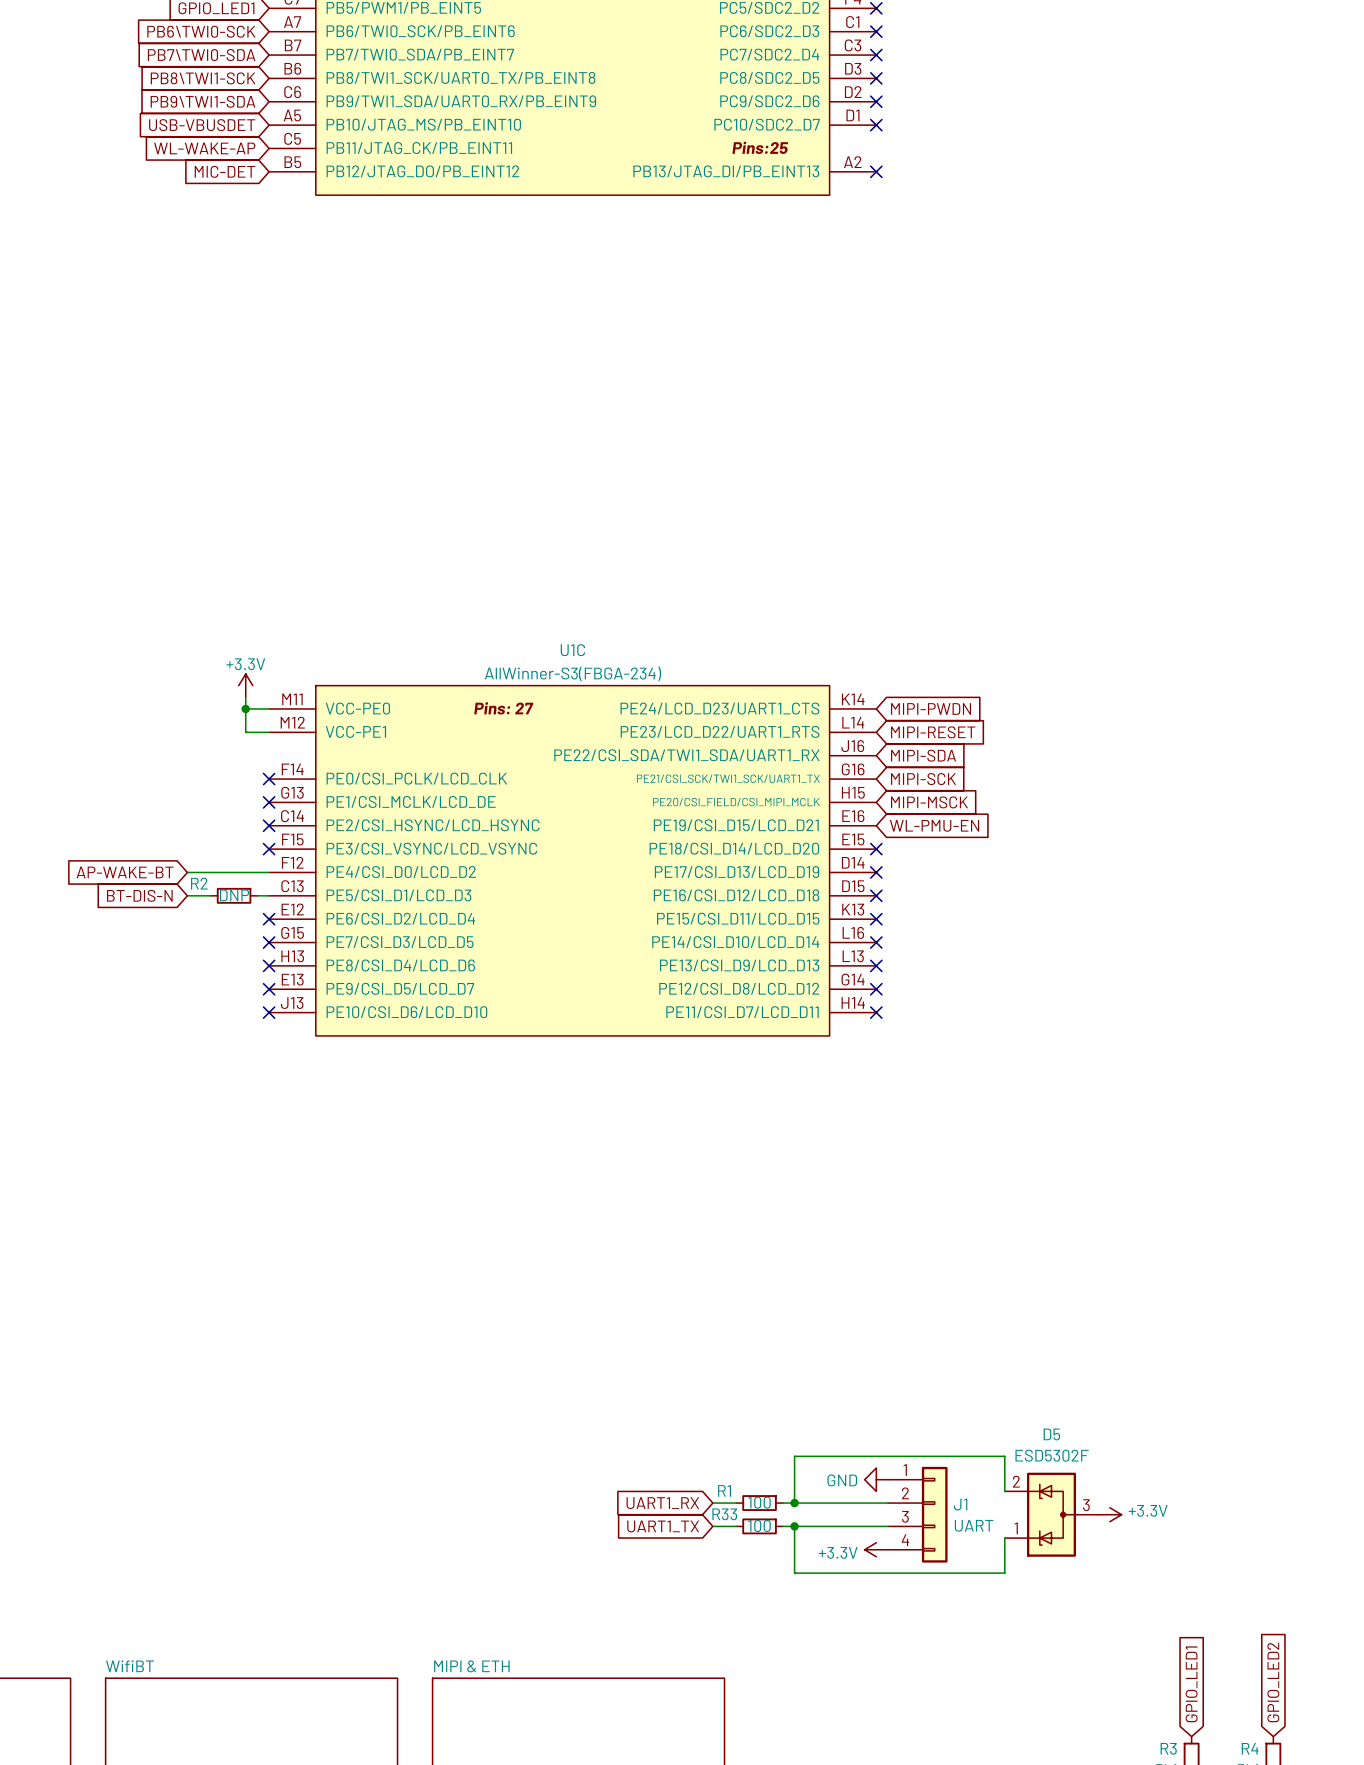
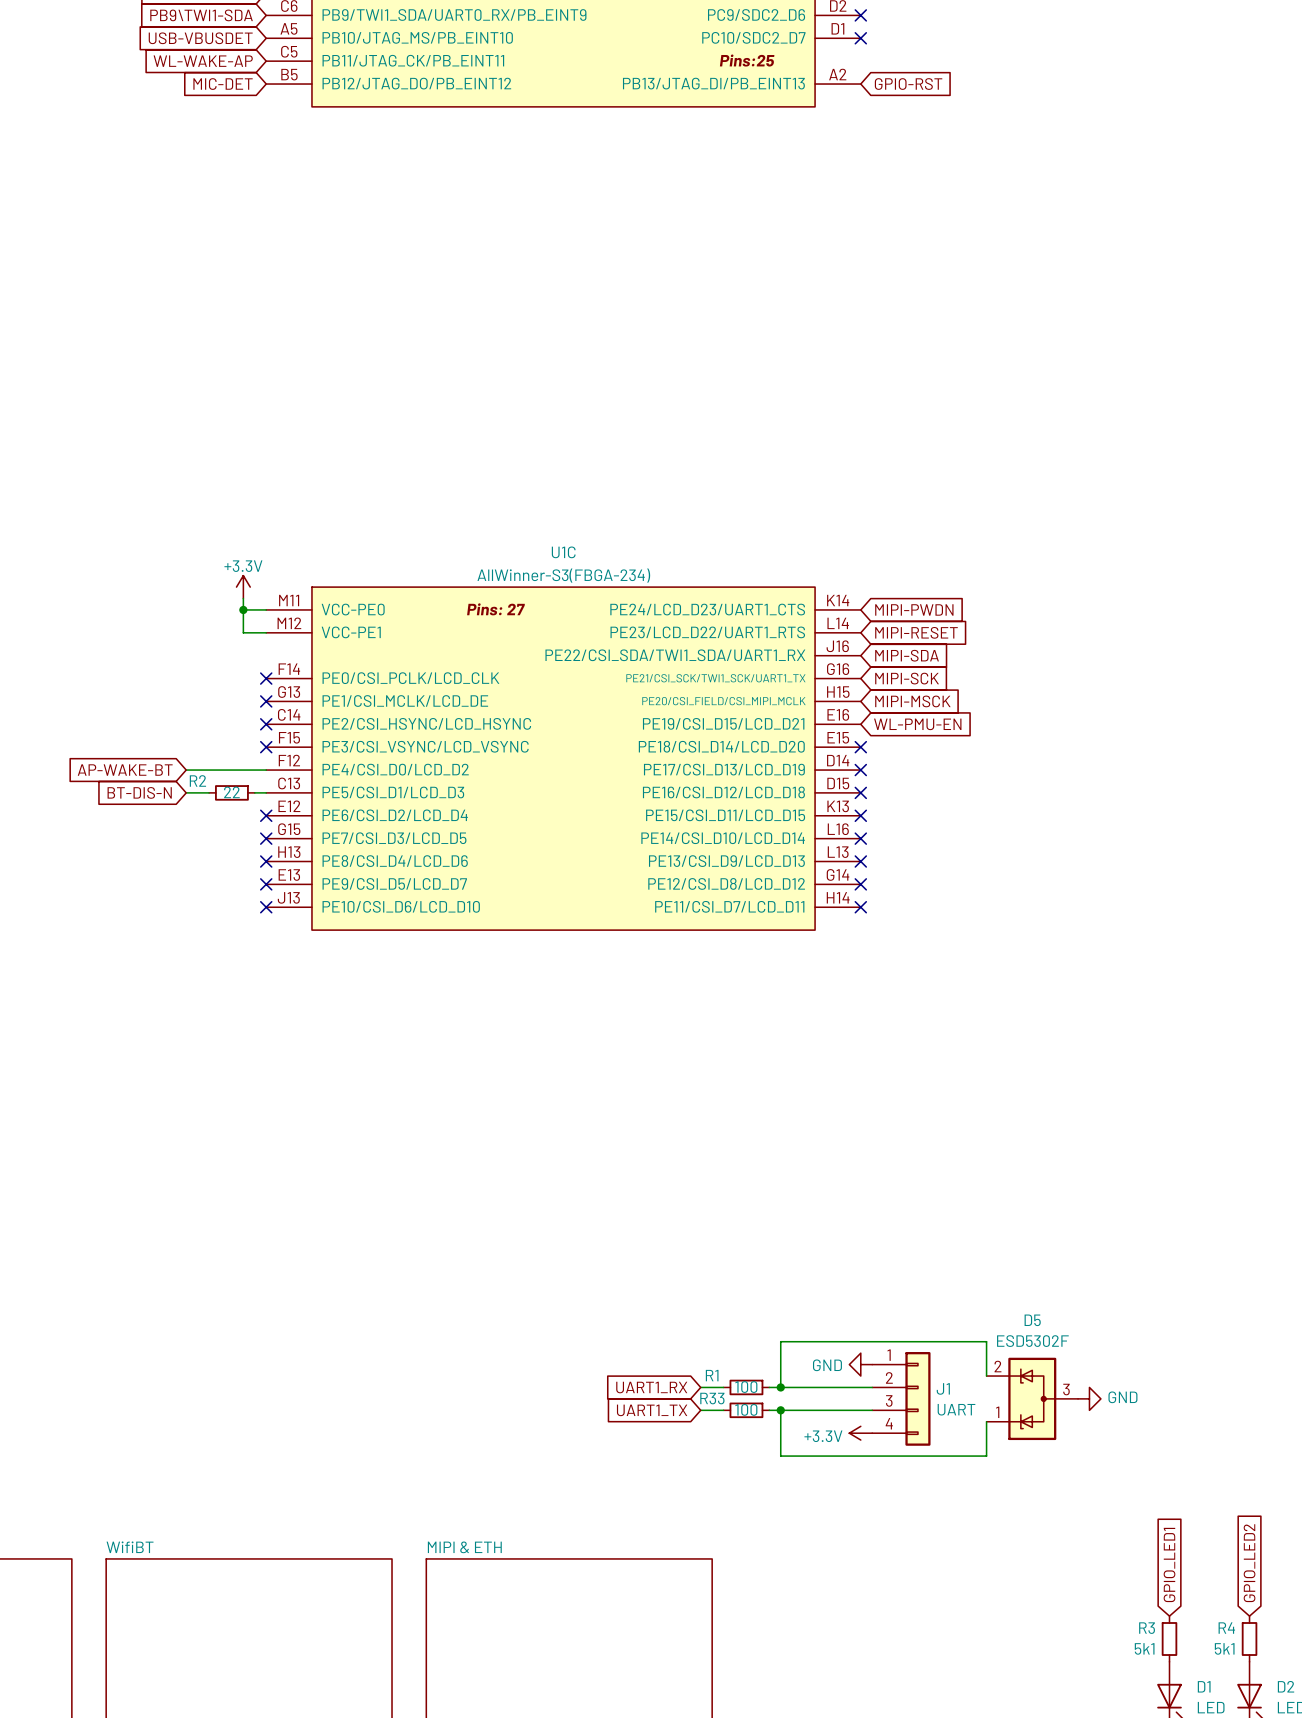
no-connect mark: (876, 171) -> none
global label: none -> GPIO-RST (908, 84)
R2 value: DNP (234, 895) -> 22 (231, 792)
power symbol: +3.3V (1109, 1514) -> GND (1089, 1398)

